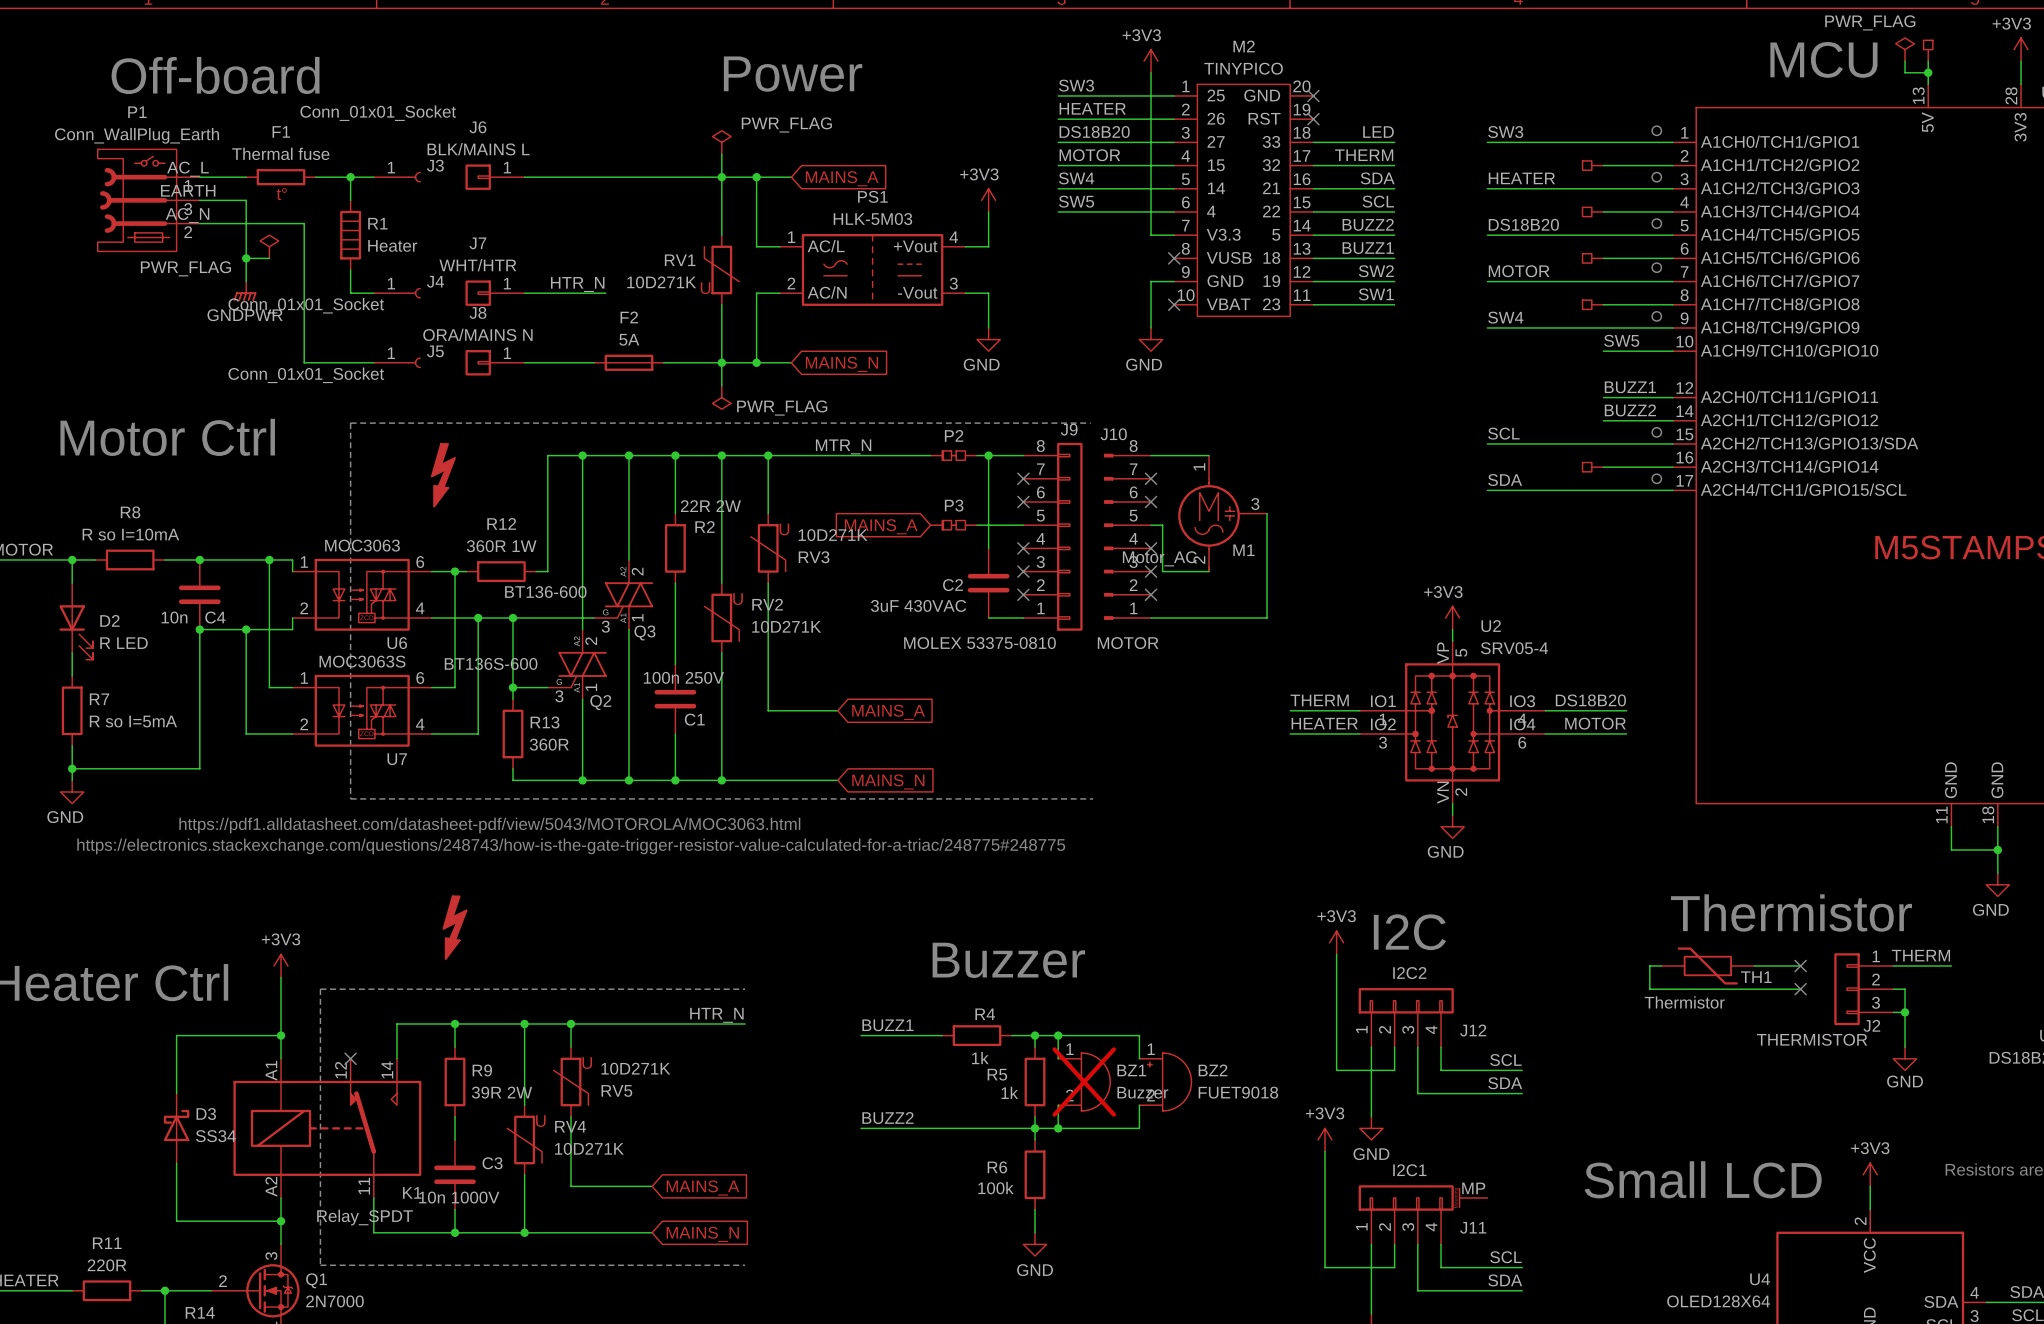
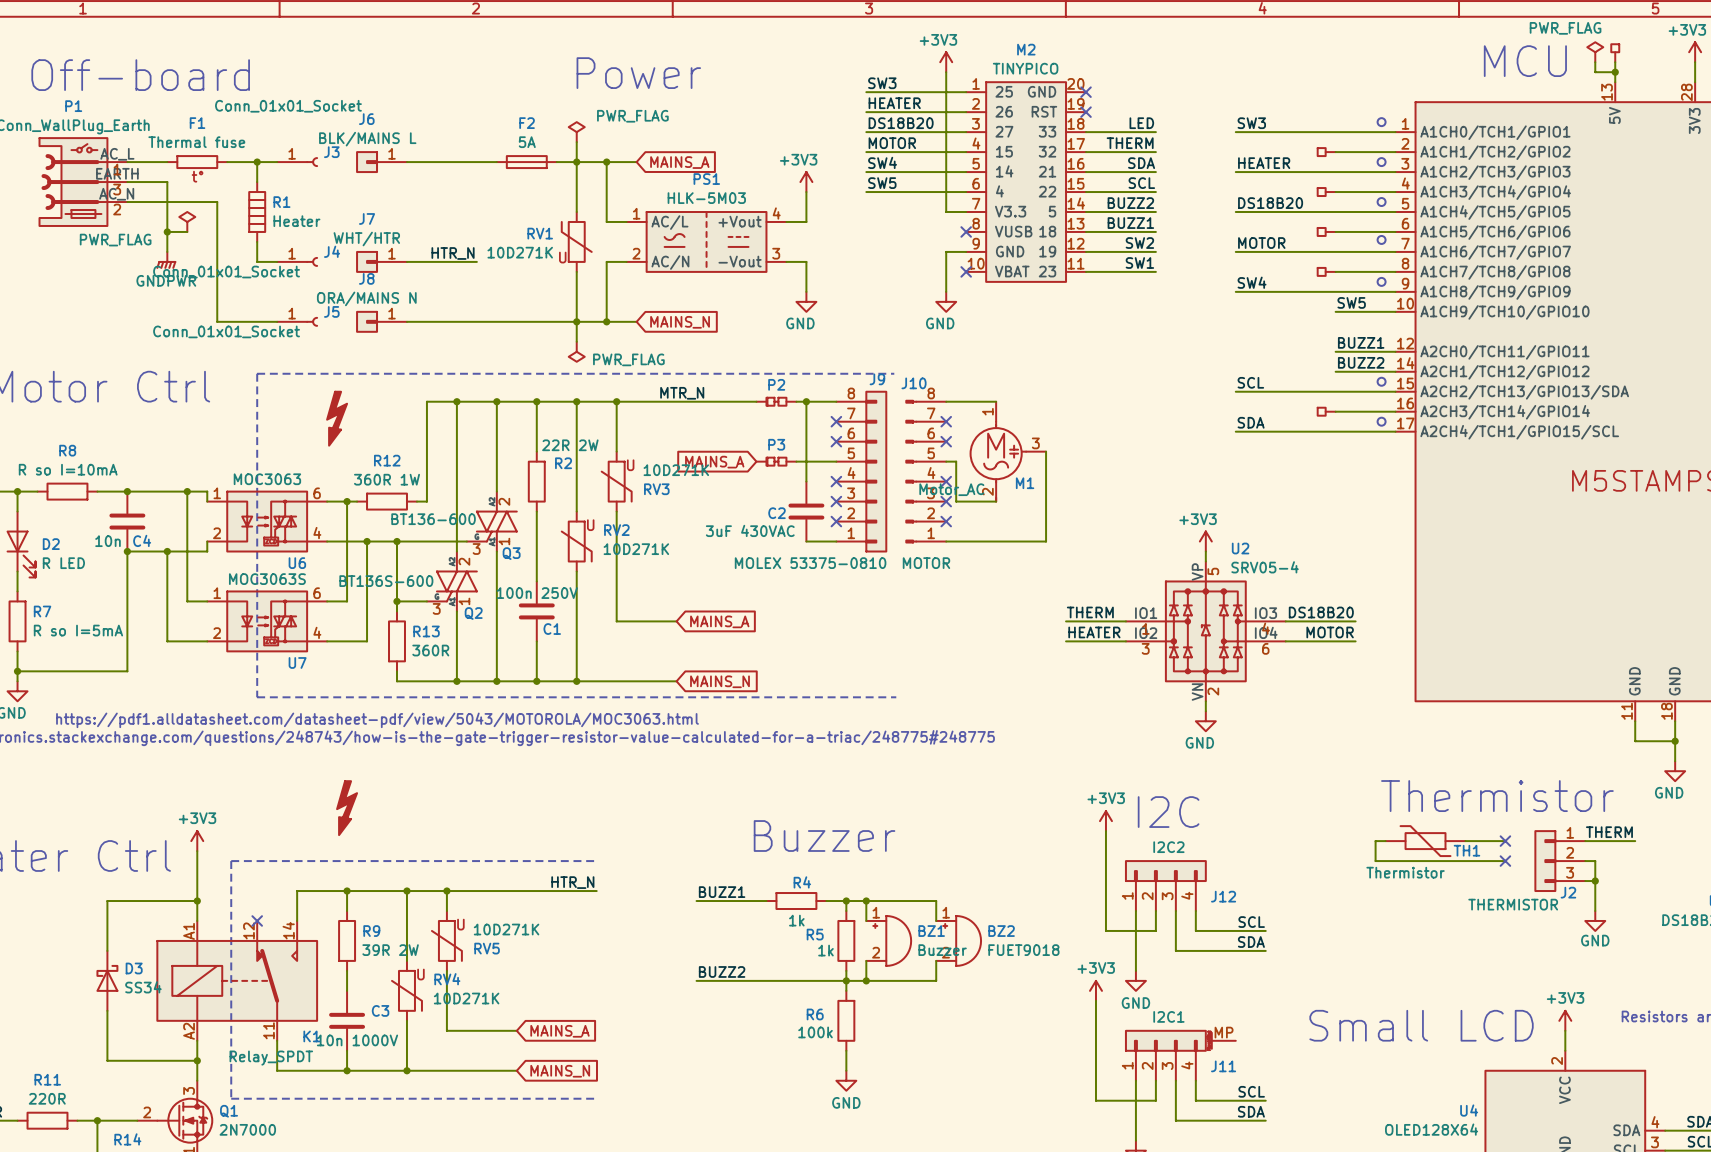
F2 position: (629, 362) -> (526, 162)
BZ1 do-not-place cross: (1084, 1081) -> none

